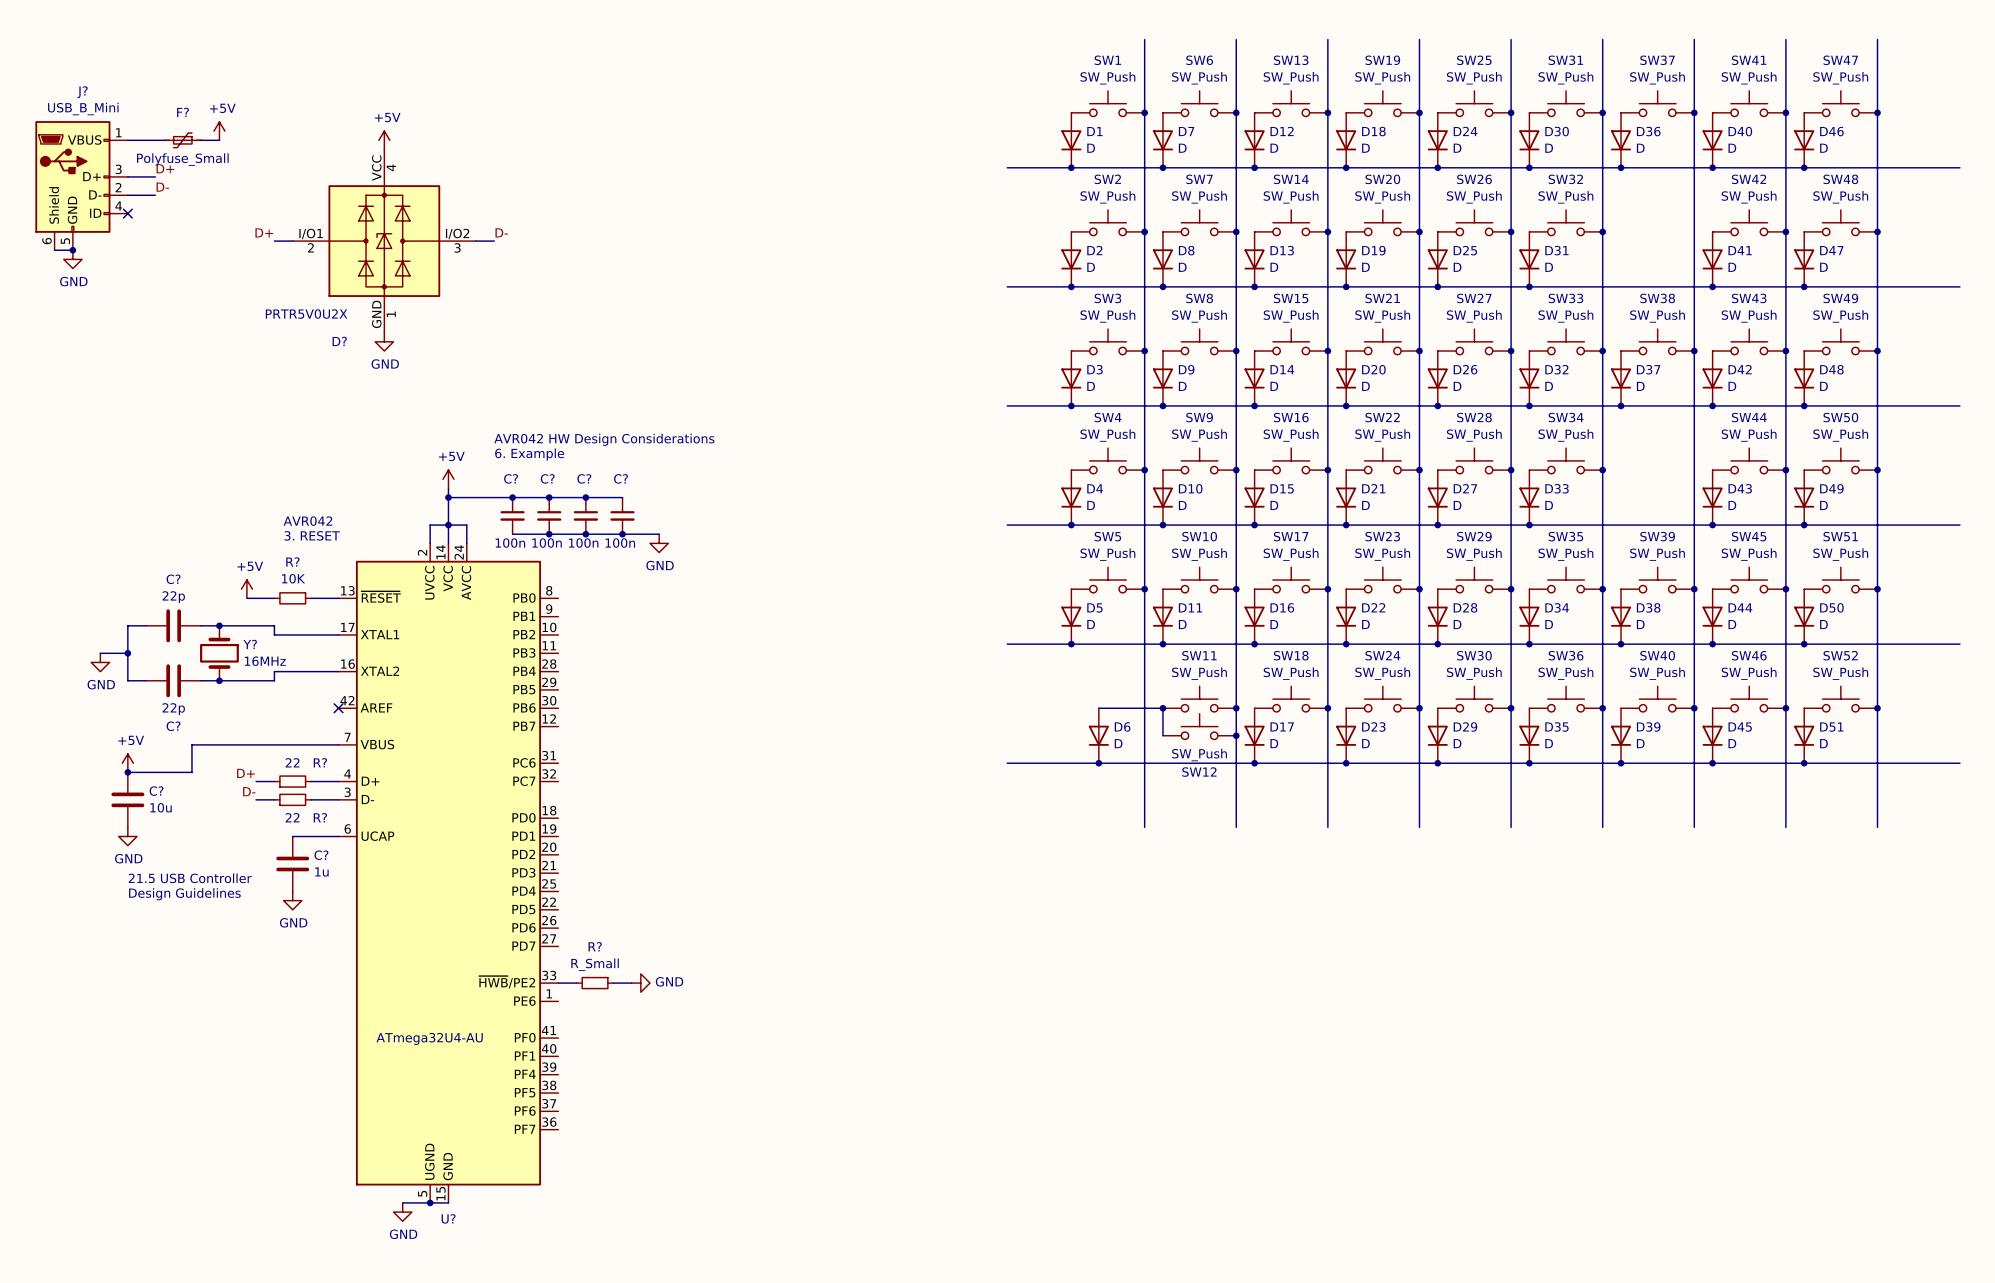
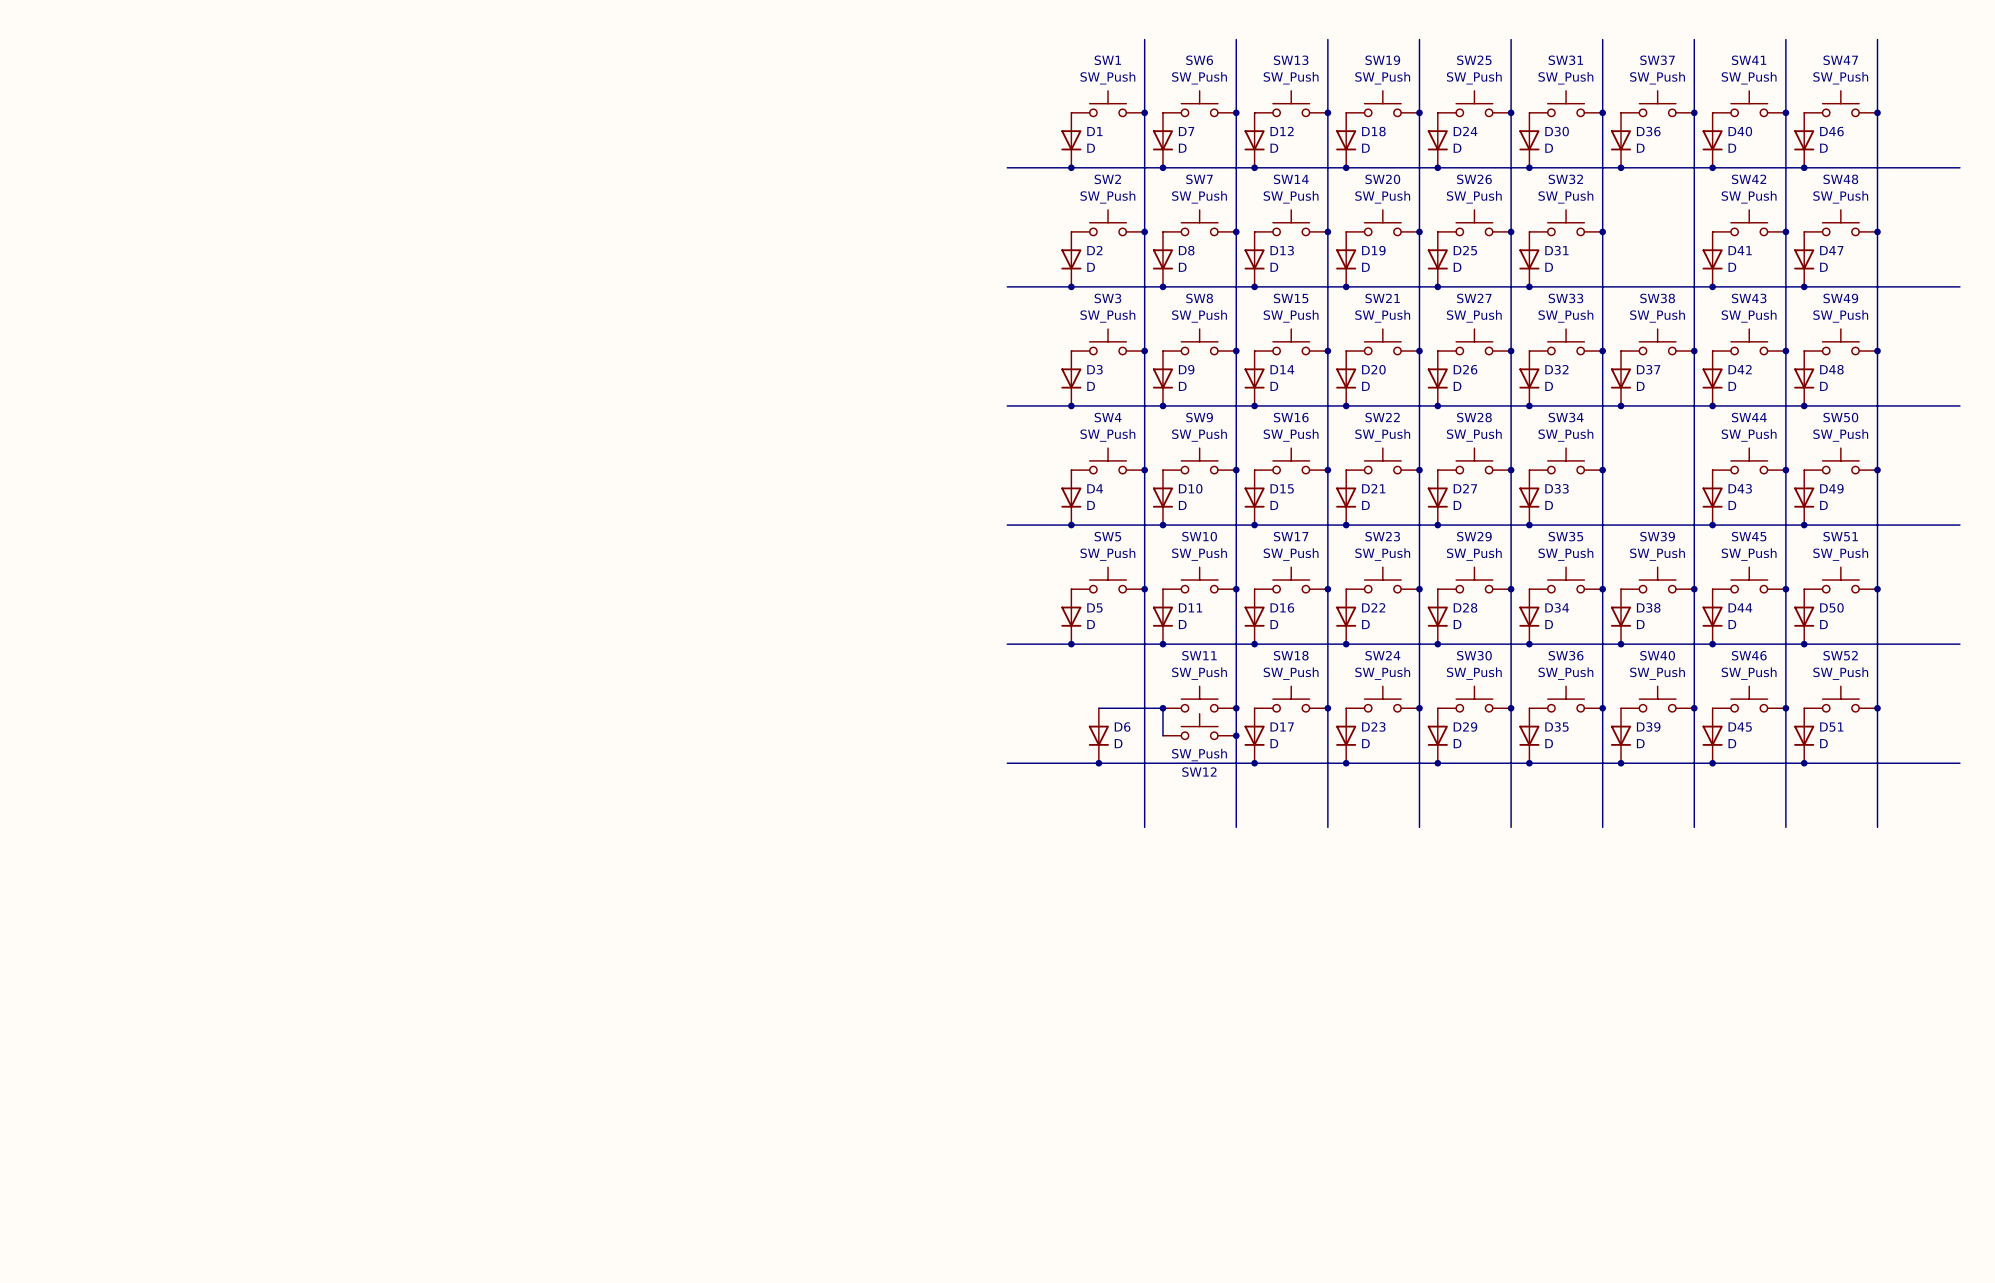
power symbol: +5V (219, 131) -> none
wire: (127, 140) (164, 140) -> none
F?: Polyfuse_Small (182, 140) -> none
wire: (201, 140) (219, 140) -> none
power symbol: +5V (384, 140) -> none
label: D+ (165, 168) -> none
wire: (127, 176) (155, 176) -> none
J?: USB_B_Mini (81, 185) -> none
label: D- (162, 187) -> none
wire: (127, 195) (155, 195) -> none
no-connect mark: (127, 213) -> none
label: D+ (264, 232) -> none
label: D- (501, 232) -> none
wire: (274, 241) (292, 241) -> none
D?: PRTR5V0U2X (384, 241) -> none
wire: (475, 241) (494, 241) -> none
wire: (54, 250) (72, 250) -> none
junction: (72, 250) -> none
power symbol: GND (72, 259) -> none
power symbol: GND (384, 341) -> none
text: AVR042 HW Design Considerations (604, 439) -> none
text: 6. Example (529, 454) -> none
power symbol: +5V (448, 479) -> none
wire: (448, 488) (448, 543) -> none
wire: (448, 497) (622, 497) -> none
junction: (448, 497) -> none
junction: (512, 497) -> none
junction: (549, 497) -> none
junction: (585, 497) -> none
C?: 100n (512, 515) -> none
C?: 100n (549, 515) -> none
C?: 100n (585, 515) -> none
C?: 100n (622, 515) -> none
text: AVR042 (307, 521) -> none
junction: (448, 525) -> none
wire: (512, 534) (659, 534) -> none
junction: (549, 534) -> none
junction: (585, 534) -> none
junction: (622, 534) -> none
text: 3. RESET (312, 535) -> none
wire: (430, 543) (430, 525) (466, 525) (466, 543) -> none
power symbol: GND (659, 543) -> none
power symbol: +5V (246, 589) -> none
wire: (246, 598) (274, 598) -> none
R?: 10K (292, 598) -> none
wire: (311, 598) (338, 598) -> none
wire: (146, 625) (127, 625) (127, 680) (146, 680) -> none
C?: 22p (173, 625) -> none
wire: (201, 625) (274, 625) (274, 634) (338, 634) -> none
junction: (219, 625) -> none
wire: (100, 653) (127, 653) -> none
junction: (127, 653) -> none
Y?: 16MHz (219, 653) -> none
power symbol: GND (100, 662) -> none
wire: (338, 671) (274, 671) (274, 680) (201, 680) -> none
C?: 22p (173, 680) -> none
junction: (219, 680) -> none
no-connect mark: (338, 708) -> none
wire: (338, 744) (191, 744) (191, 772) (127, 772) -> none
power symbol: +5V (127, 763) -> none
junction: (127, 772) -> none
label: D+ (245, 773) -> none
wire: (256, 781) (274, 781) -> none
R?: 22 (292, 781) -> none
wire: (311, 781) (338, 781) -> none
label: D- (249, 791) -> none
C?: 10u (127, 799) -> none
wire: (256, 799) (274, 799) -> none
R?: 22 (292, 799) -> none
wire: (311, 799) (338, 799) -> none
power symbol: GND (127, 836) -> none
wire: (292, 836) (338, 836) -> none
C?: 1u (292, 863) -> none
U?: ATmega32U4-AU (448, 873) -> none
text: 21.5 USB Controller (190, 878) -> none
text: Design Guidelines (184, 894) -> none
power symbol: GND (292, 900) -> none
wire: (558, 983) (576, 983) -> none
R?: R_Small (595, 983) -> none
wire: (613, 983) (631, 983) -> none
power symbol: GND (640, 983) -> none
wire: (402, 1202) (448, 1202) -> none
junction: (430, 1202) -> none
power symbol: GND (402, 1212) -> none

